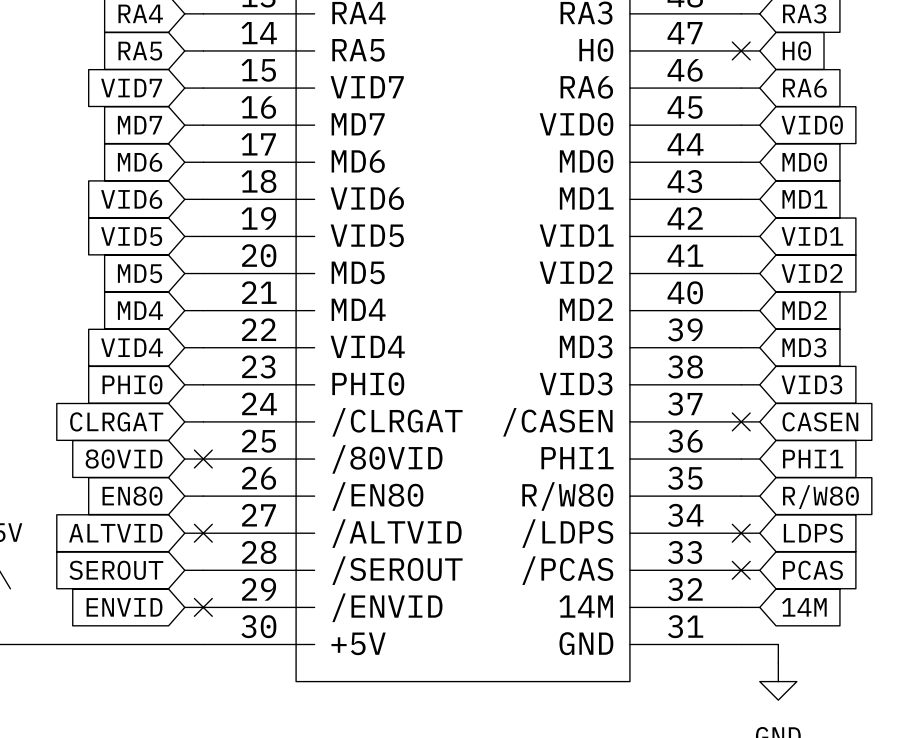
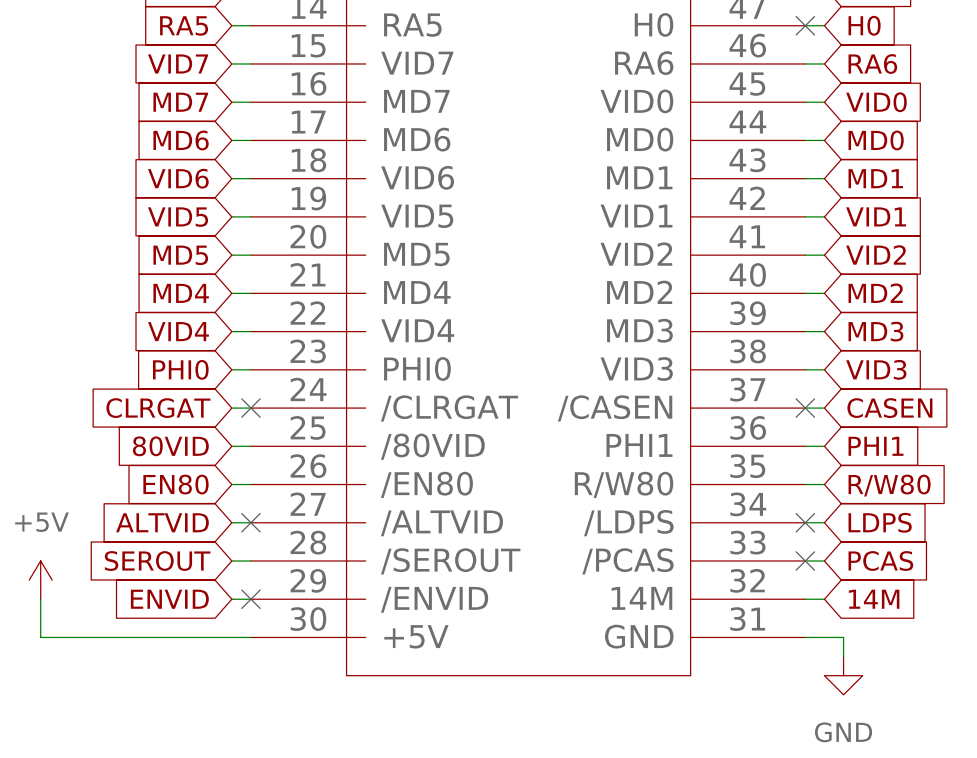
no-connect mark position: (203, 459) -> (250, 408)

